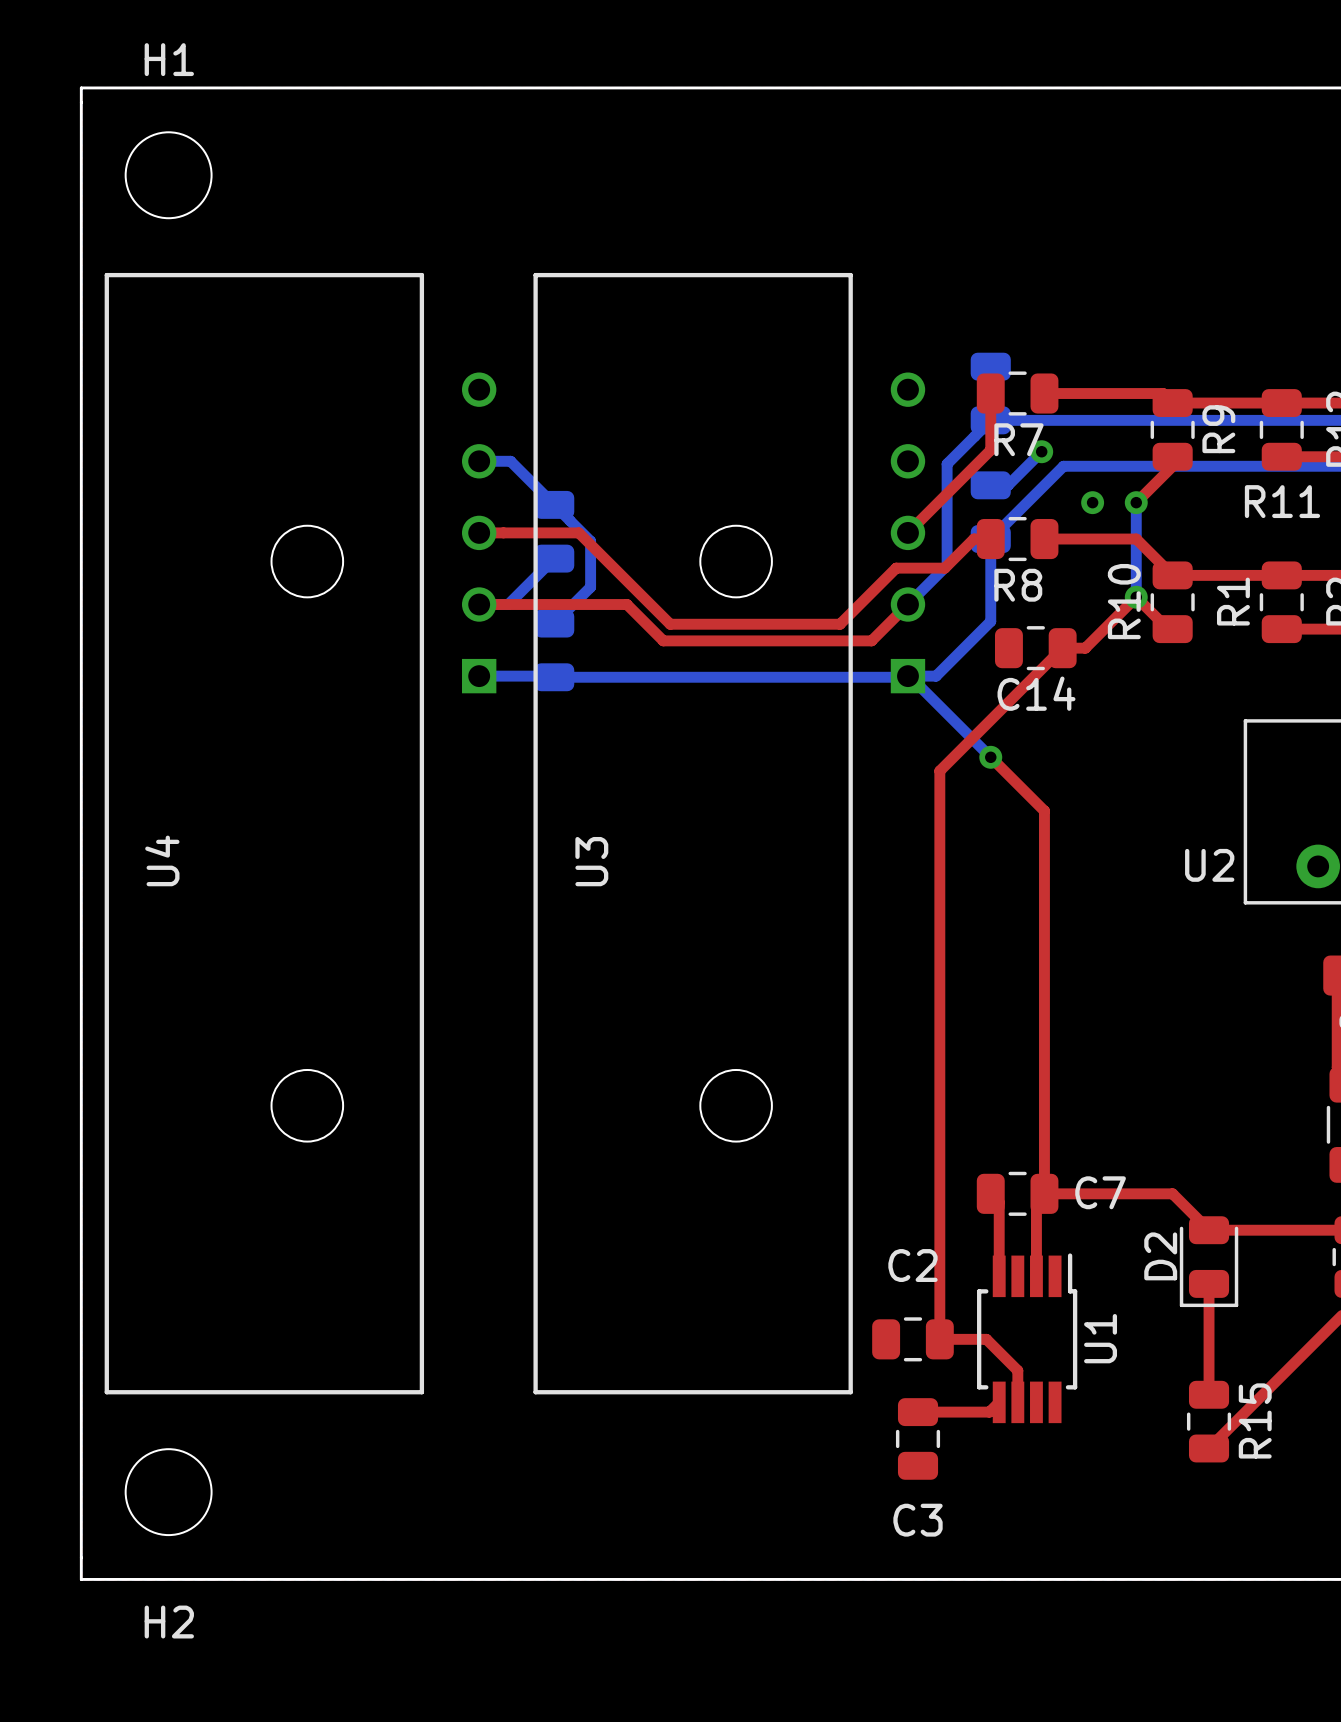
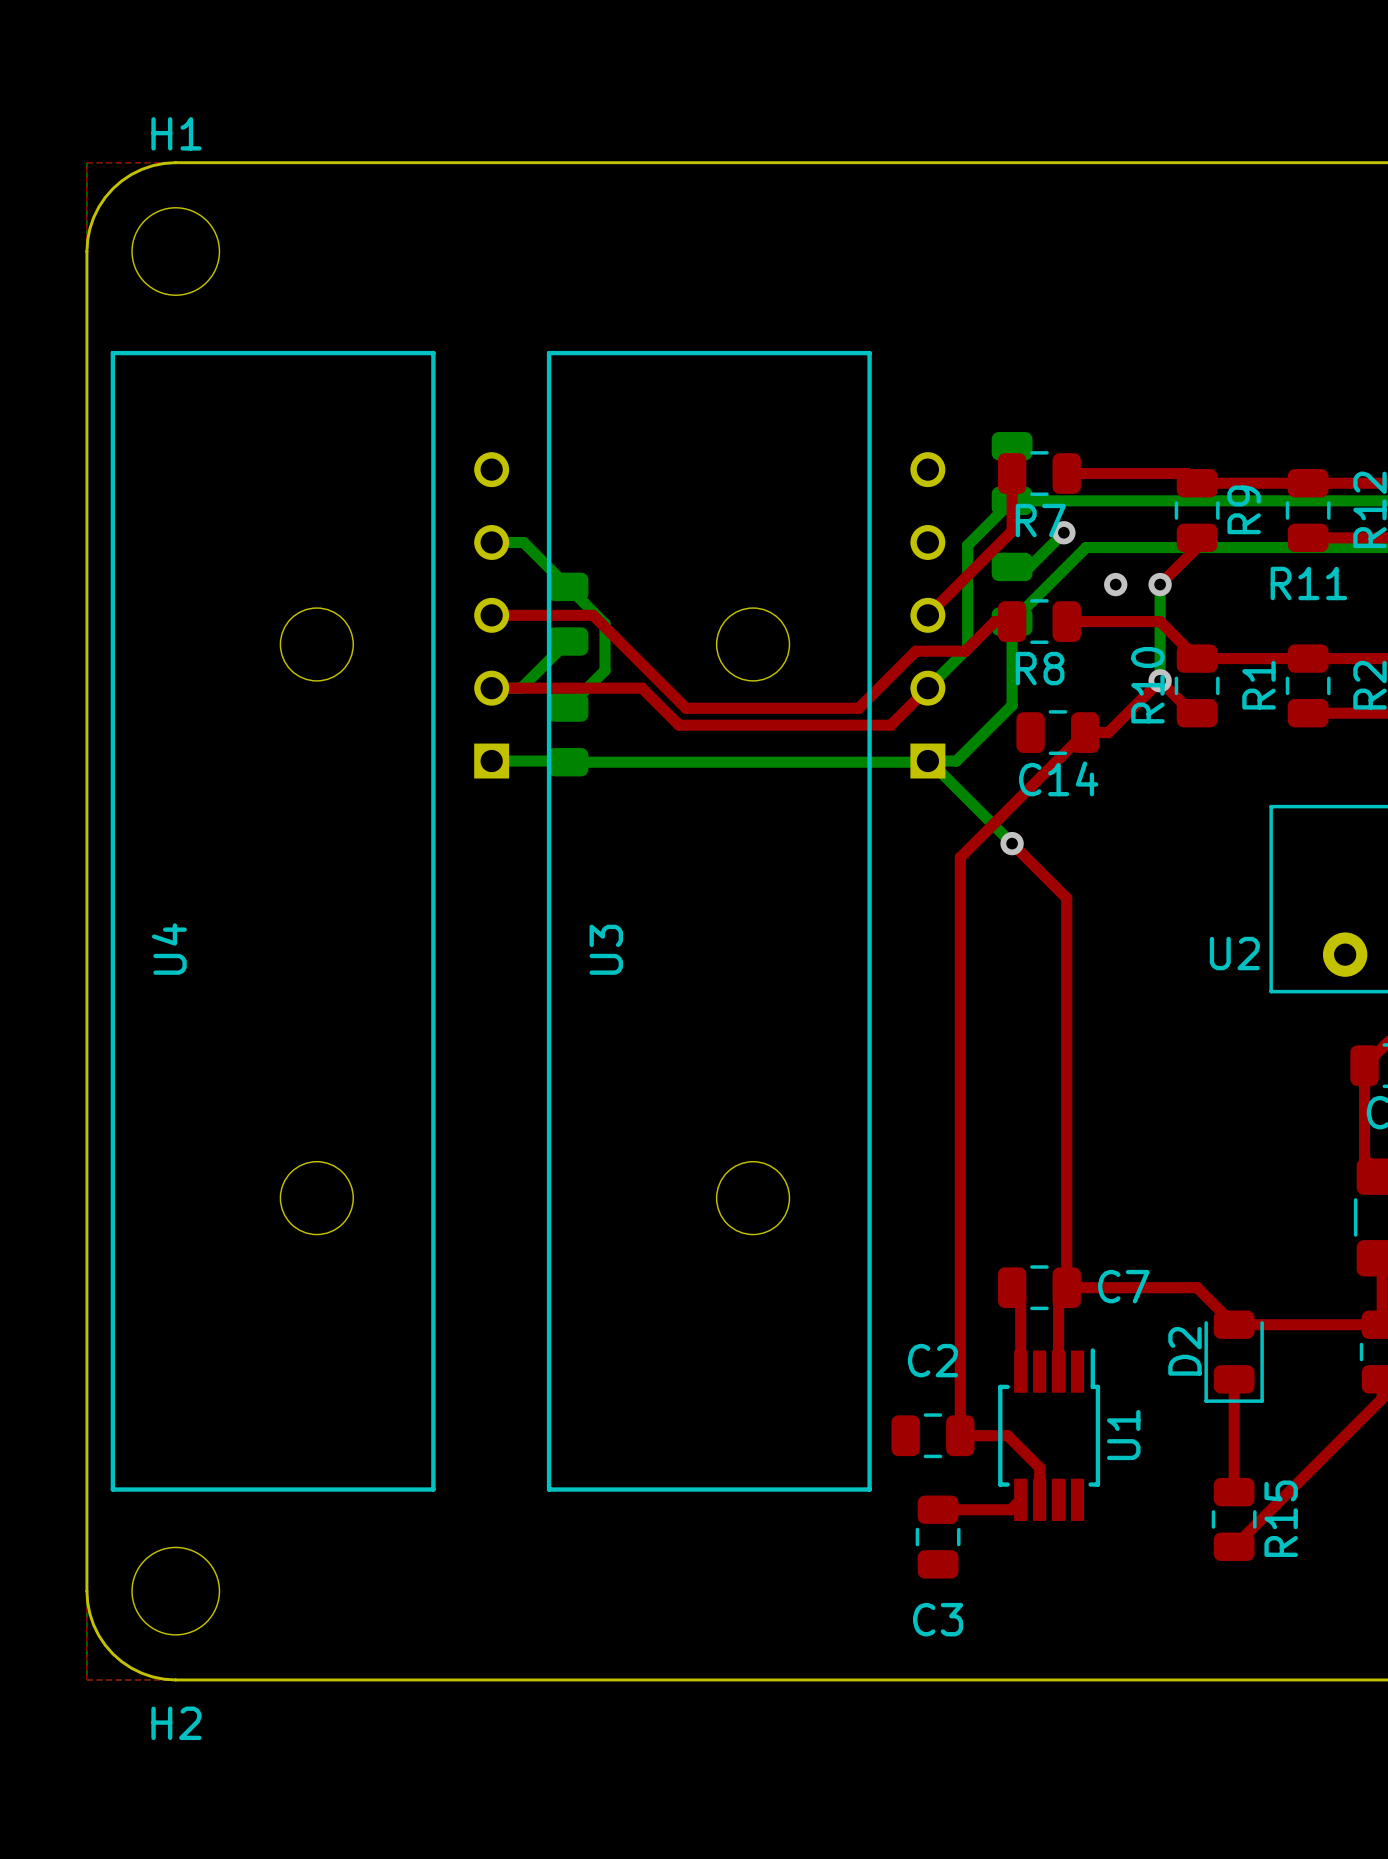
board edge: (168, 87) (81, 87) (81, 175) -> (175, 162) (152, 165) (141, 169) (131, 174) (112, 188) (105, 197) (93, 217) (87, 239) (86, 251)
board edge: (81, 1492) (81, 1579) (168, 1579) -> (86, 1591) (89, 1614) (93, 1625) (98, 1635) (112, 1653) (131, 1668) (141, 1673) (152, 1676) (175, 1679)

